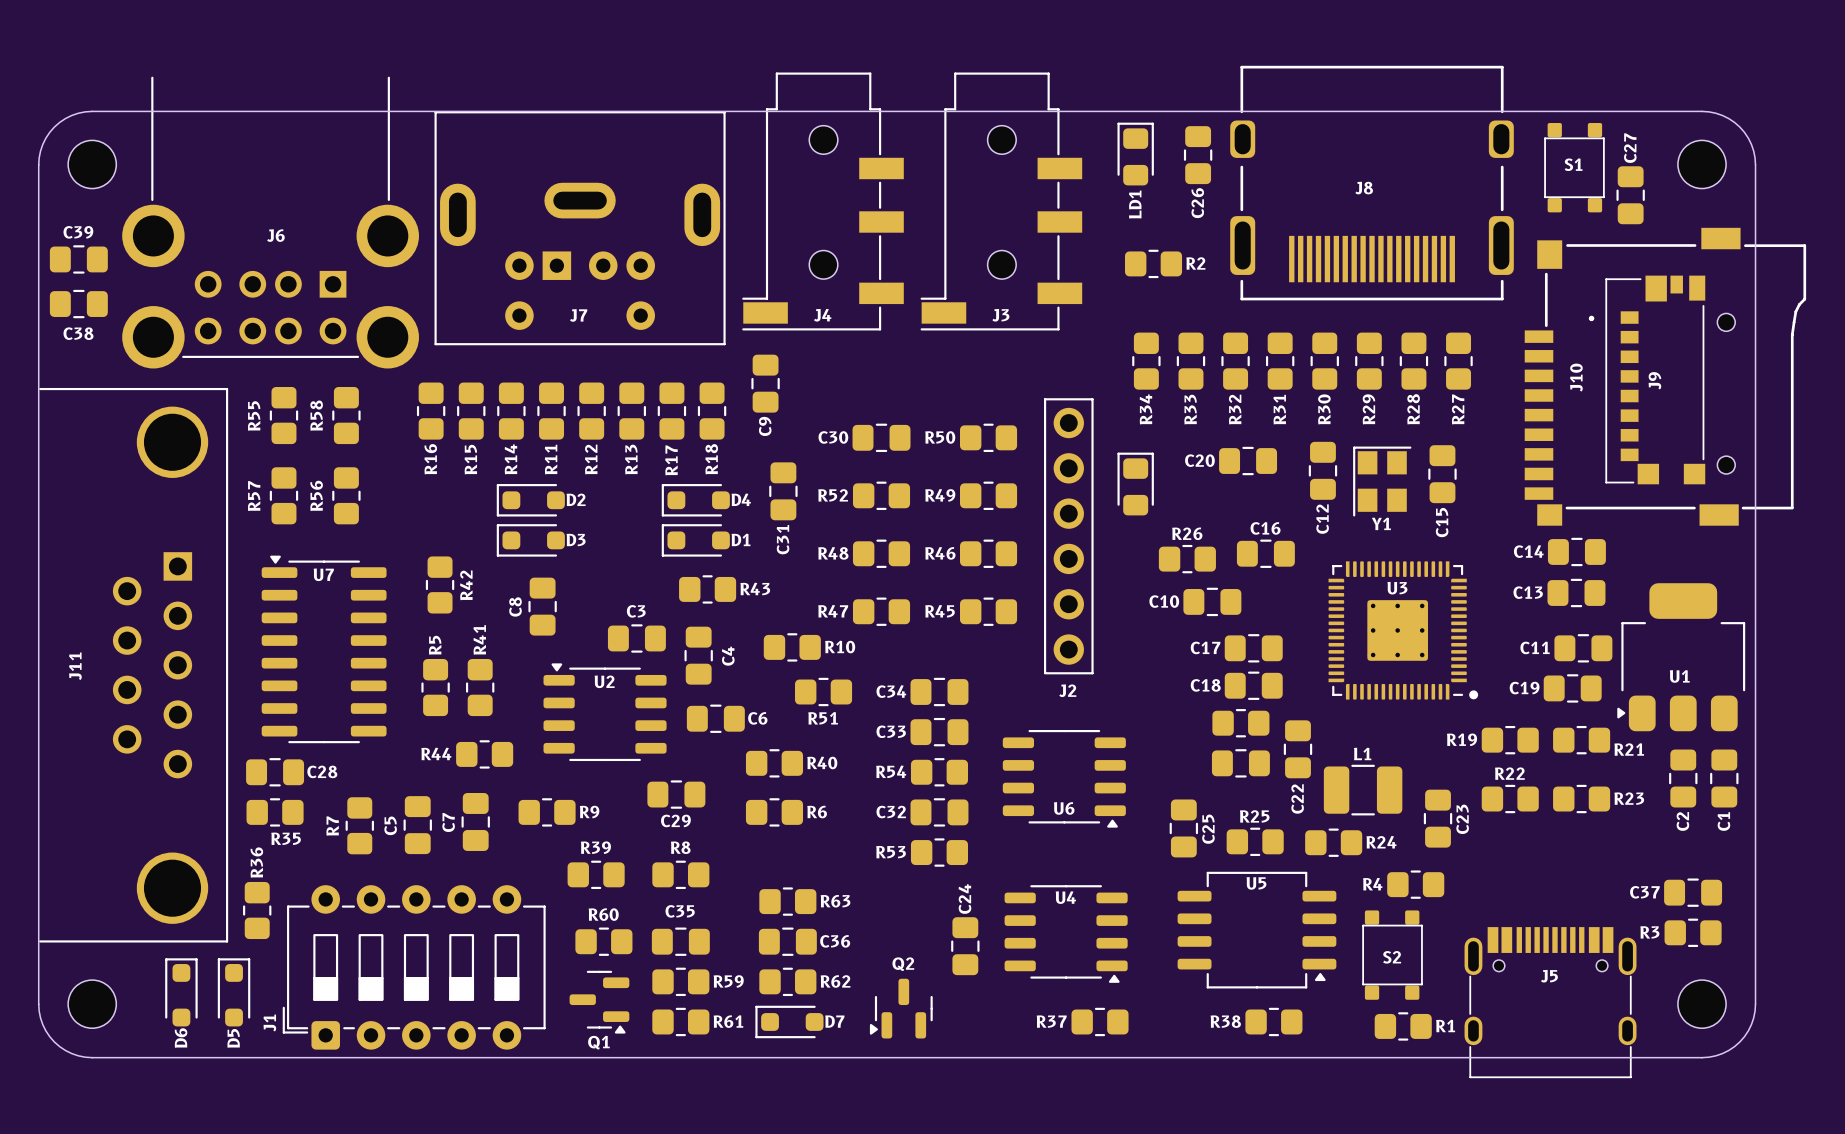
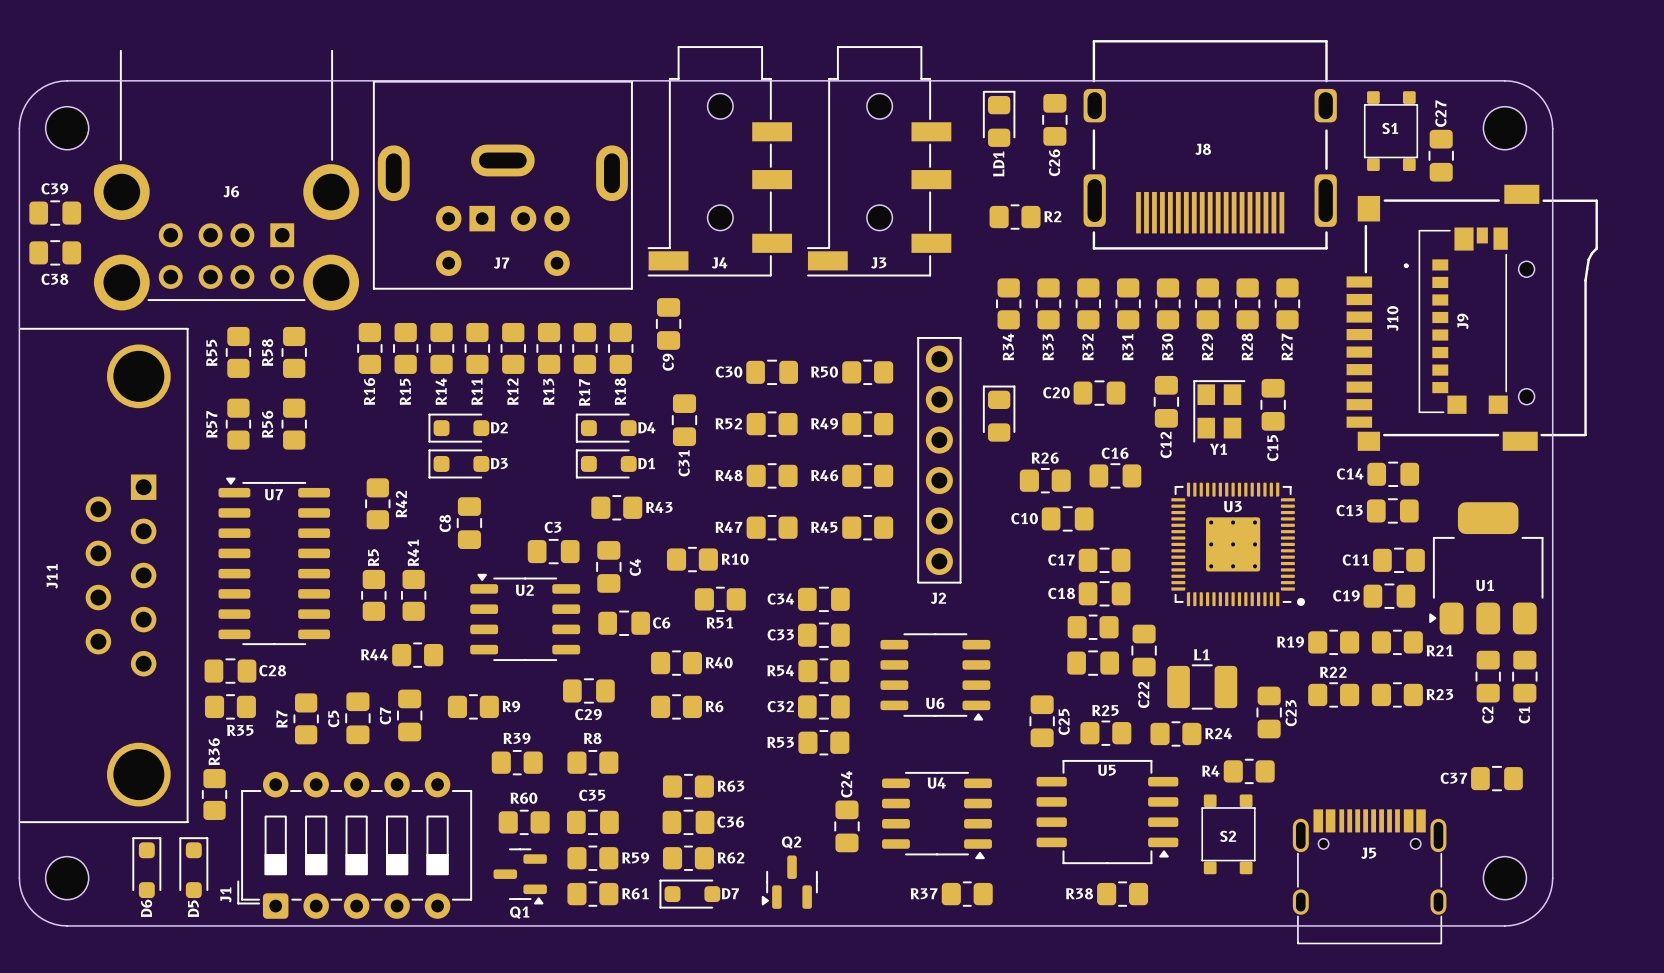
R3: (1693, 932) -> none
R1: (1403, 1026) -> none

